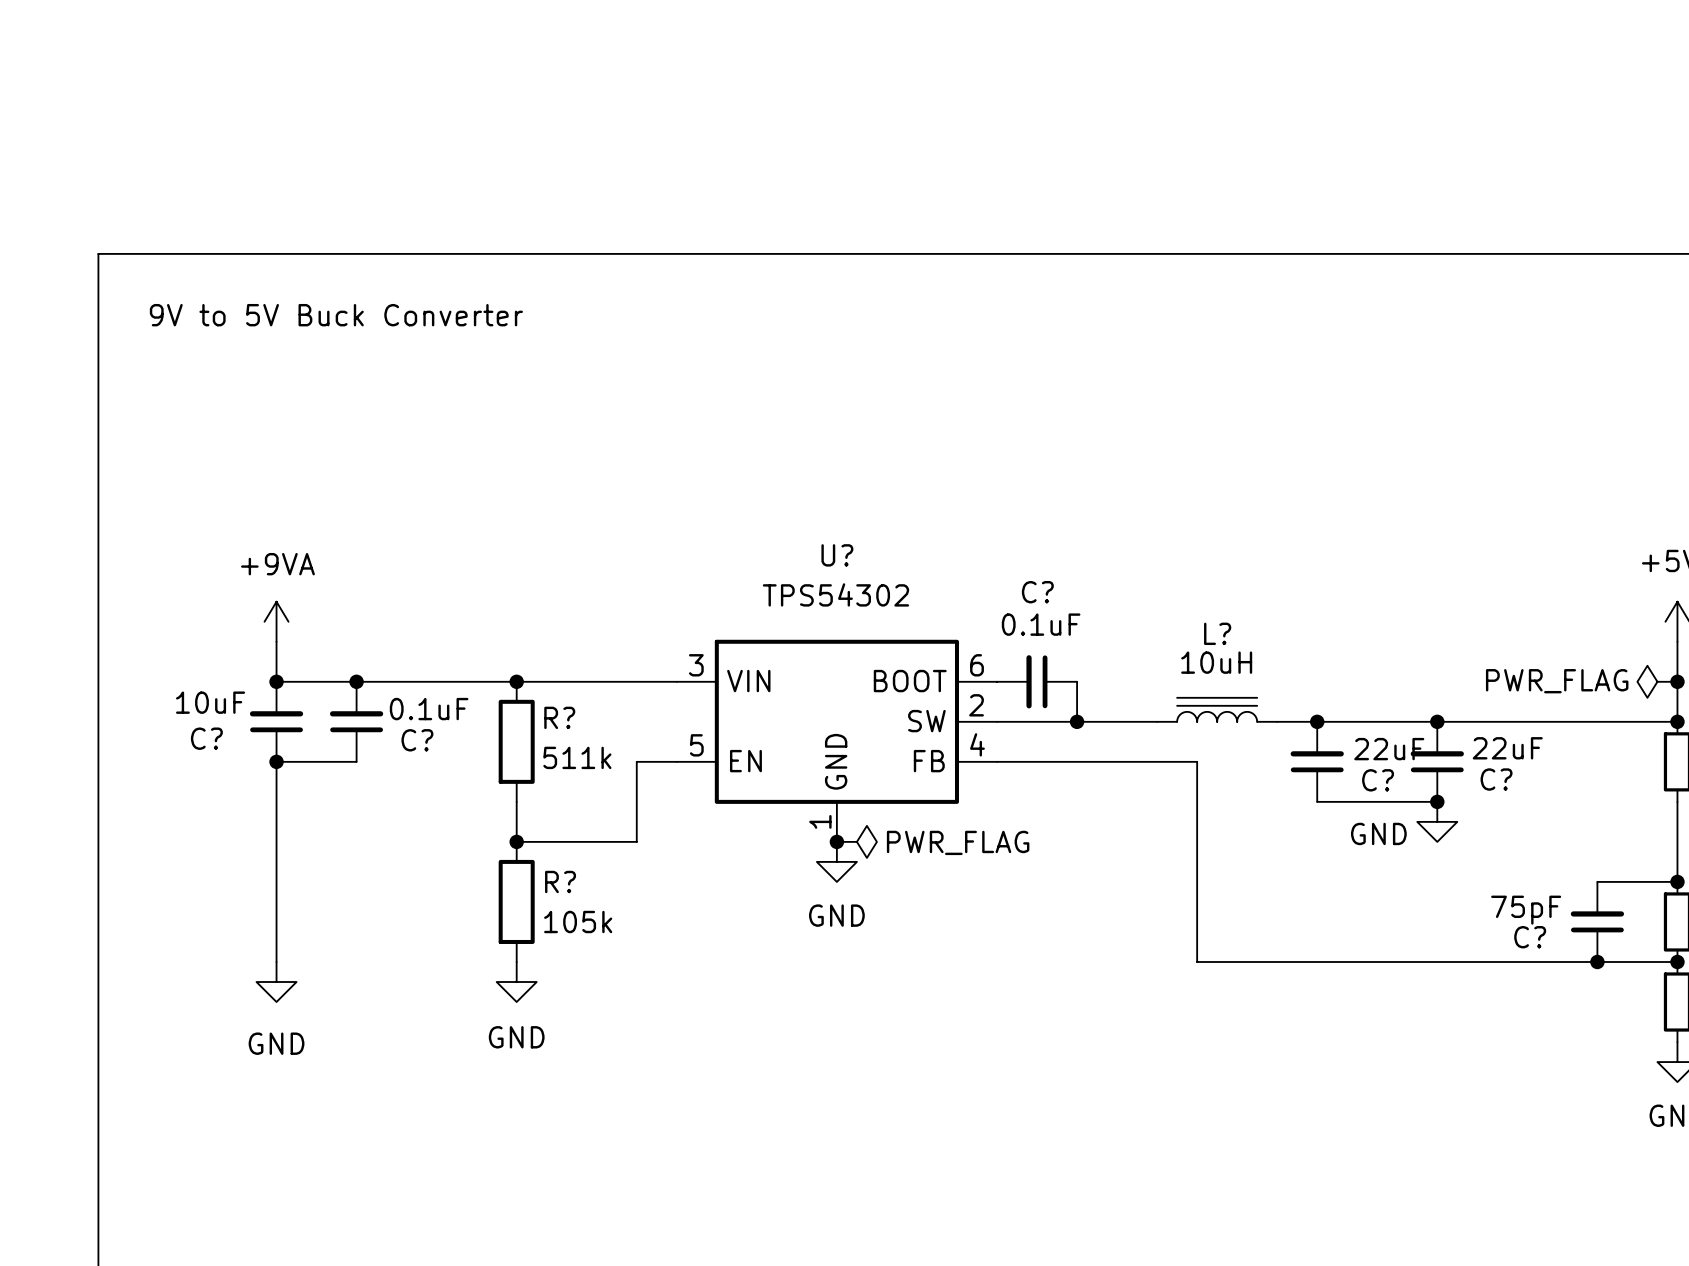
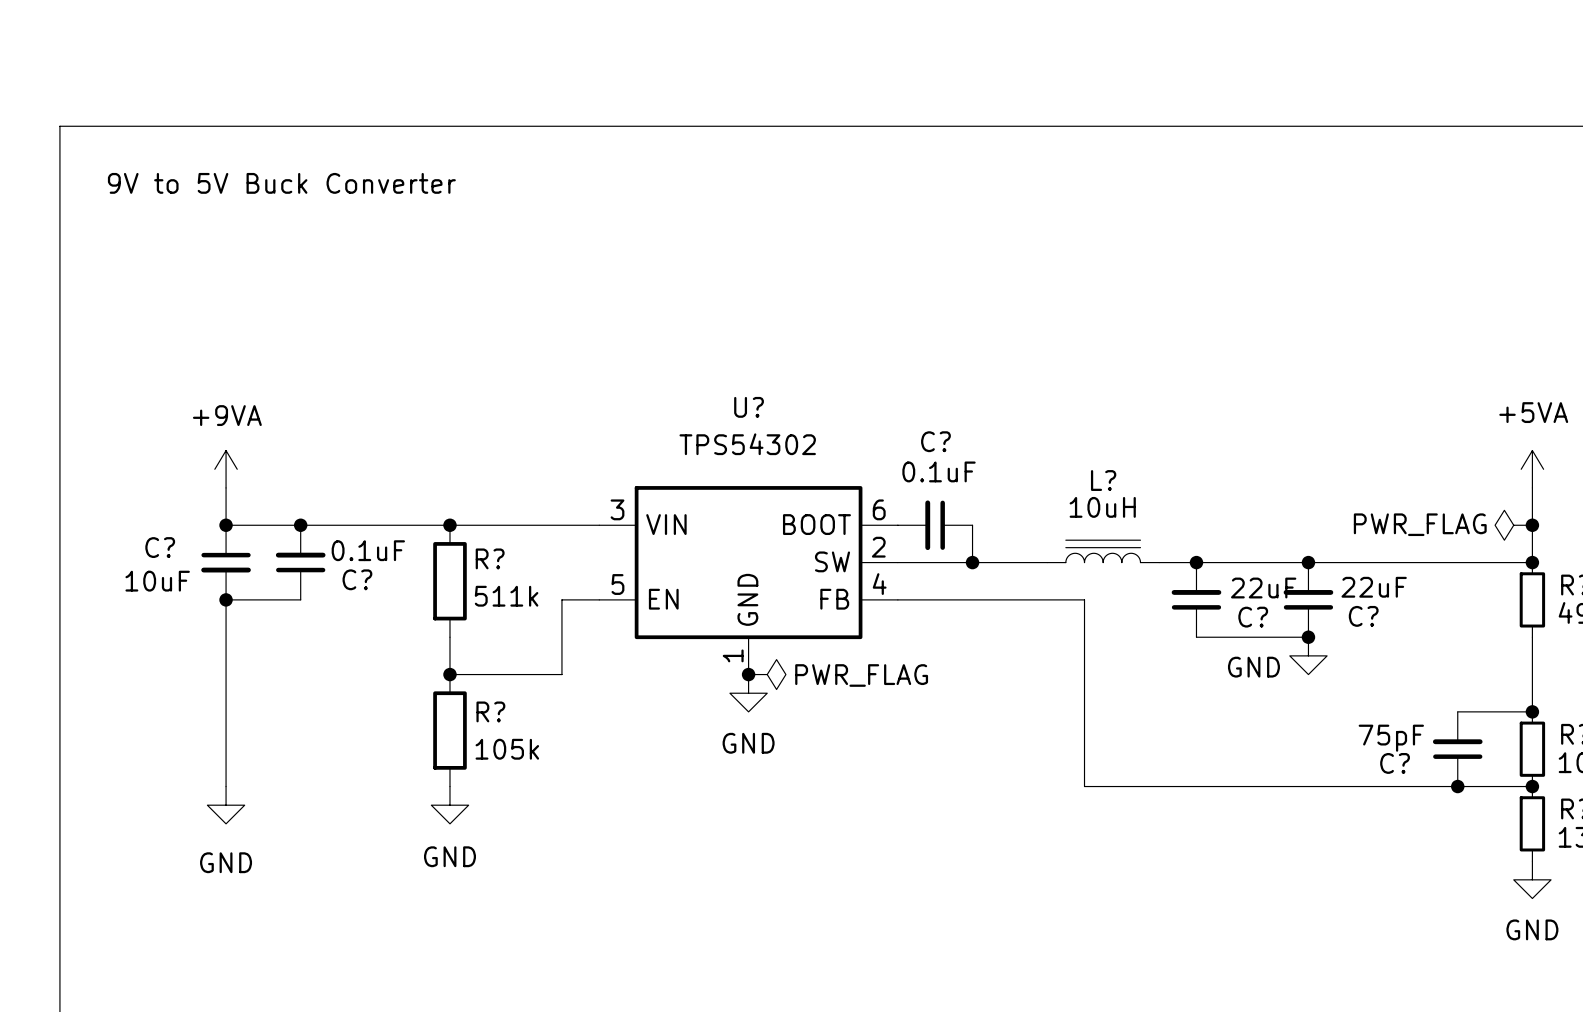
C? value position: 10uF (210, 702) -> 10uF (157, 581)
C? rotation: 0° (276, 721) -> 180° (226, 562)
C? name position: C? (206, 738) -> C? (160, 547)

